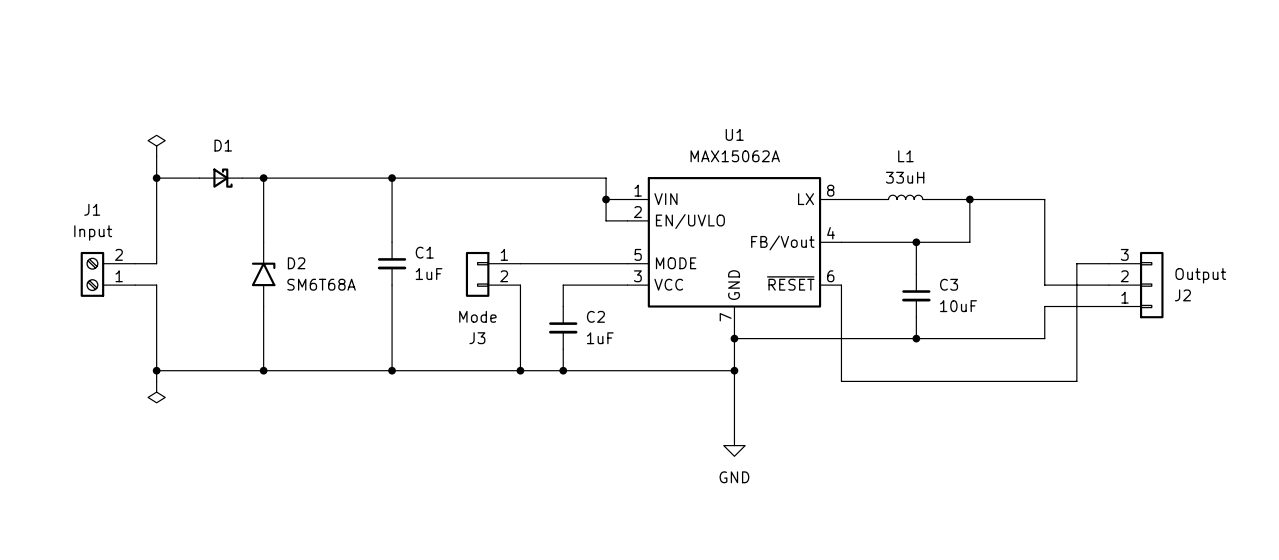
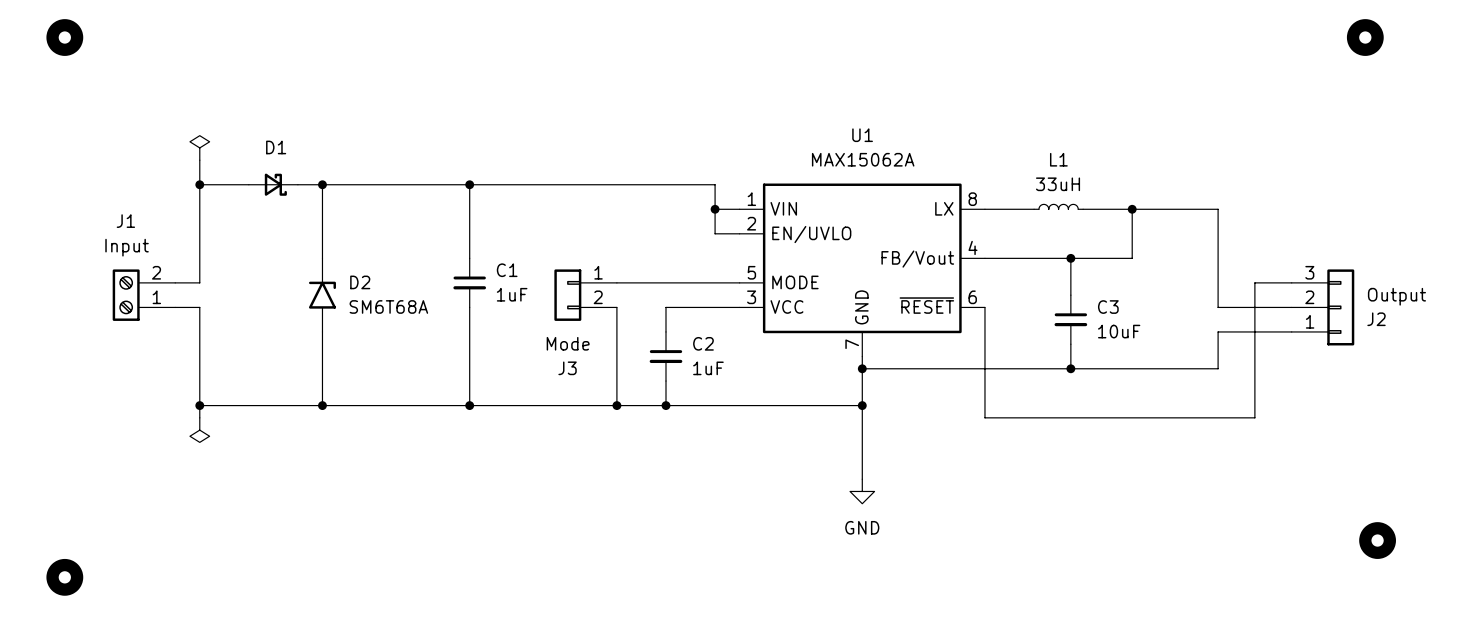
part: none -> (64, 37)
part: none -> (1365, 37)
part: none -> (1377, 540)
part: none -> (64, 577)

